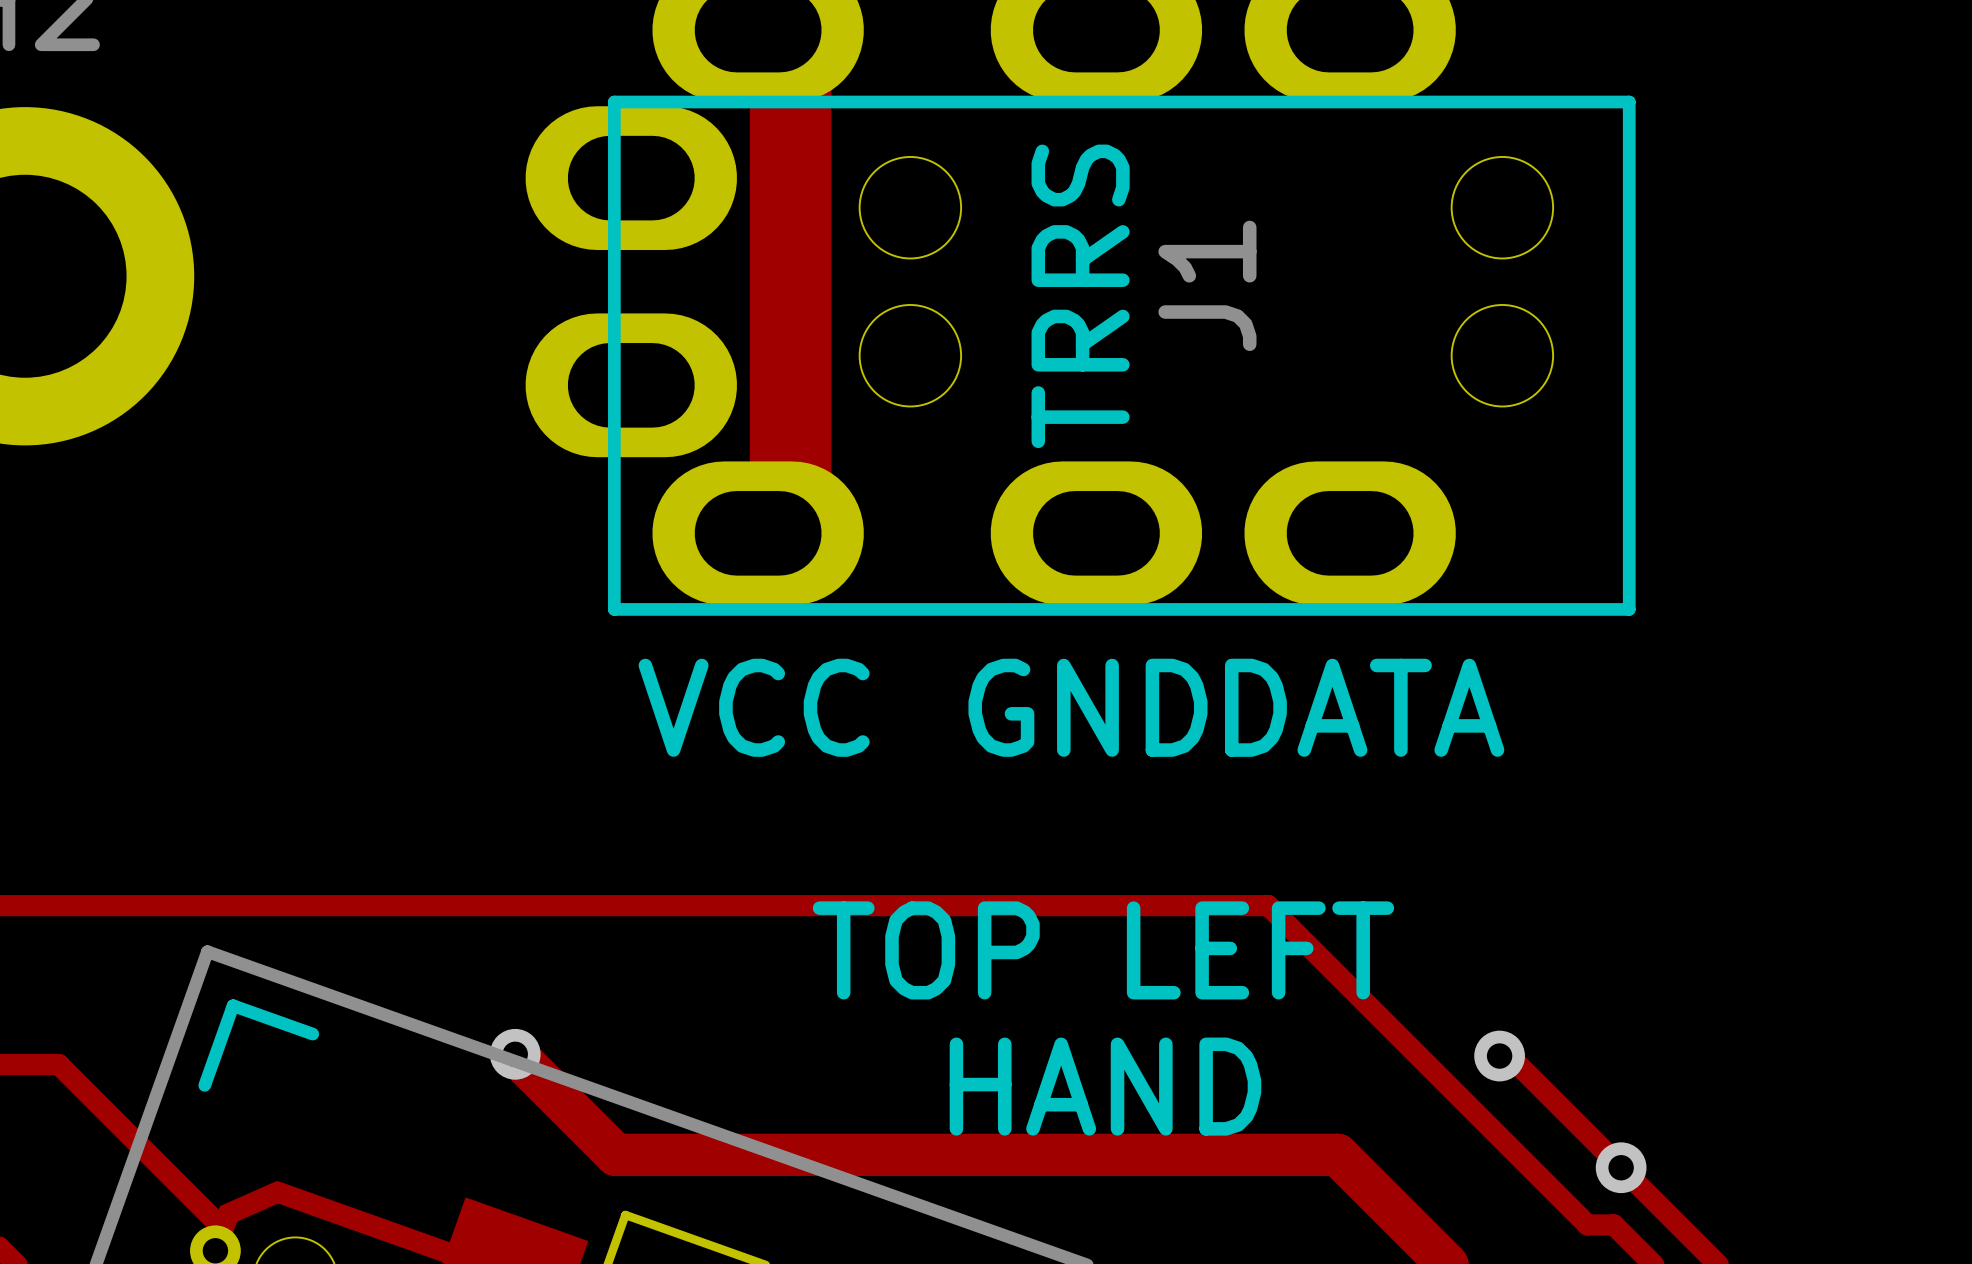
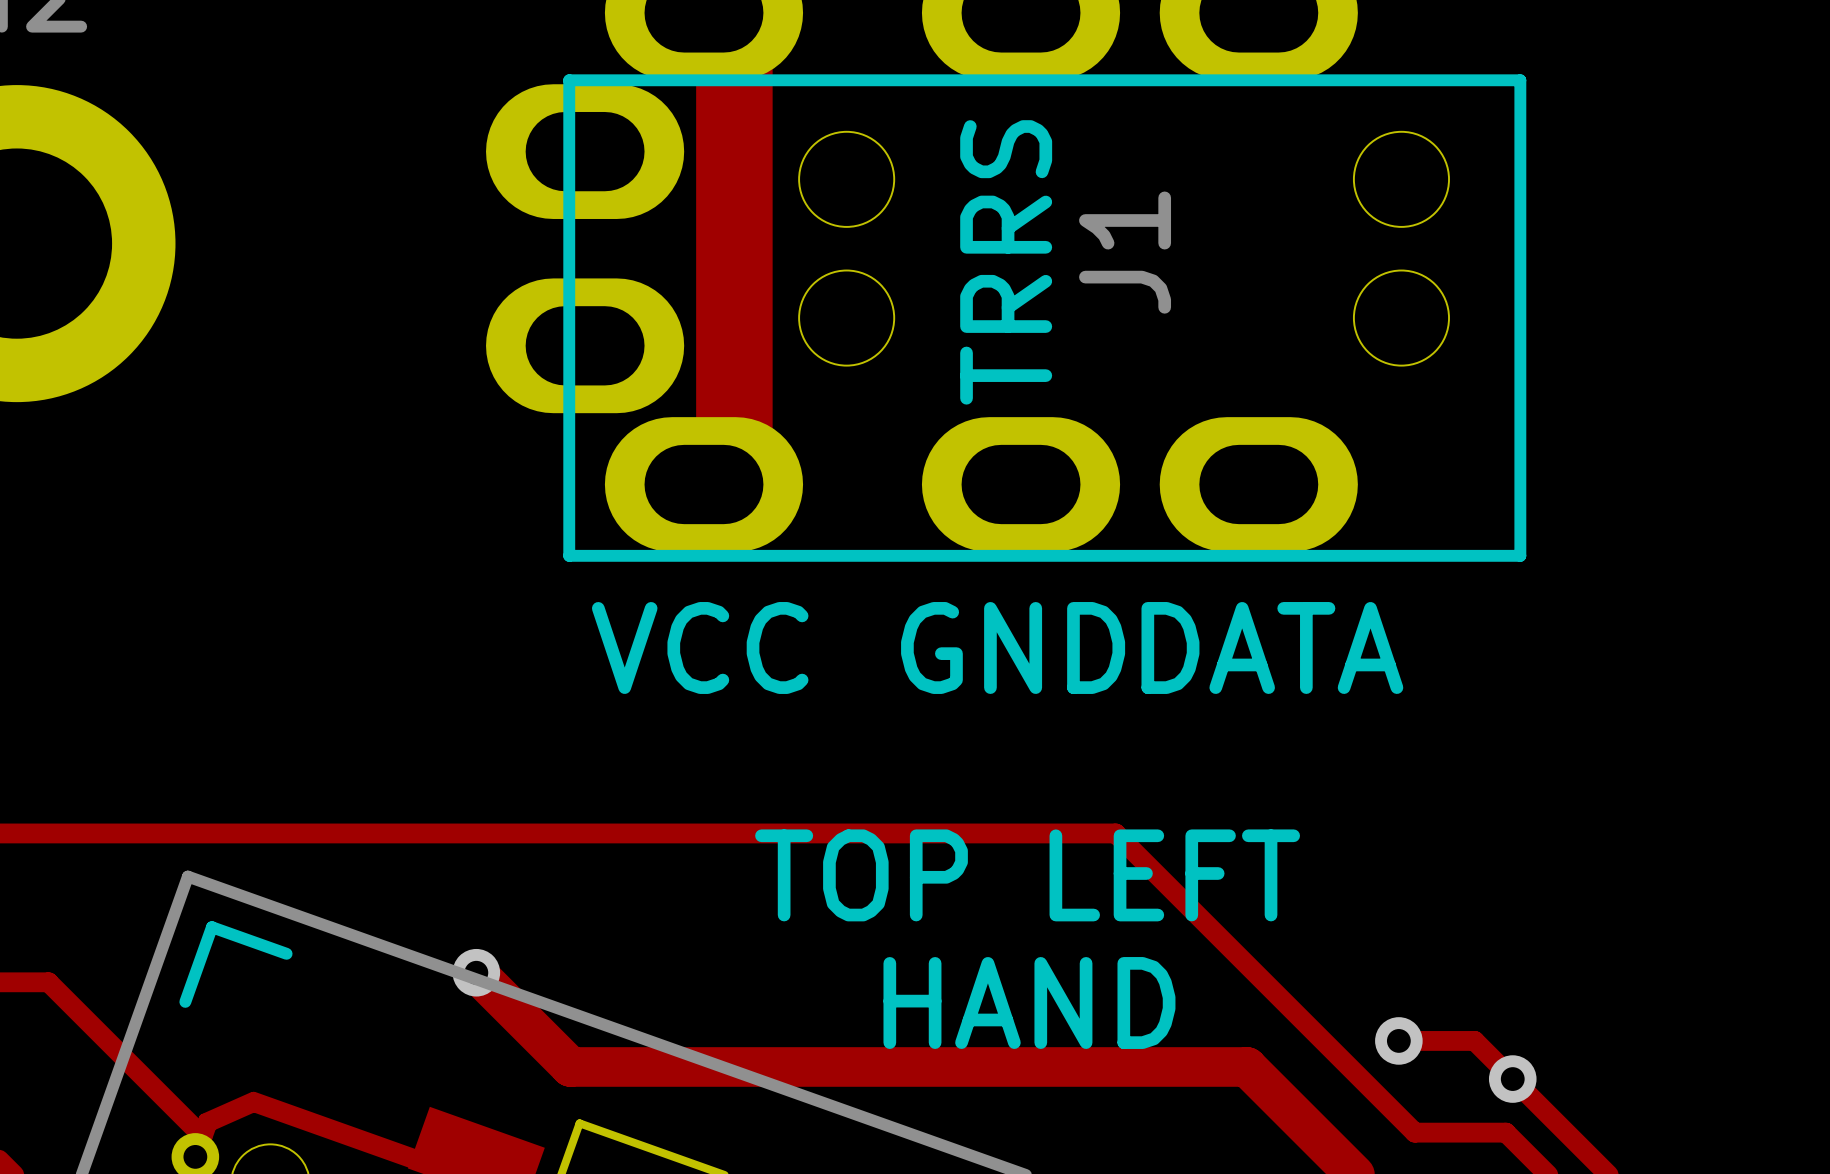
track: (1197, 905) (1268, 905) (1587, 1224) -> (1115, 833) (1414, 1132) (1481, 1132)
track: (1499, 1056) (1509, 1056) (1580, 1127) -> (1398, 1040) (1474, 1040)
via position: (1499, 1056) -> (1398, 1040)

